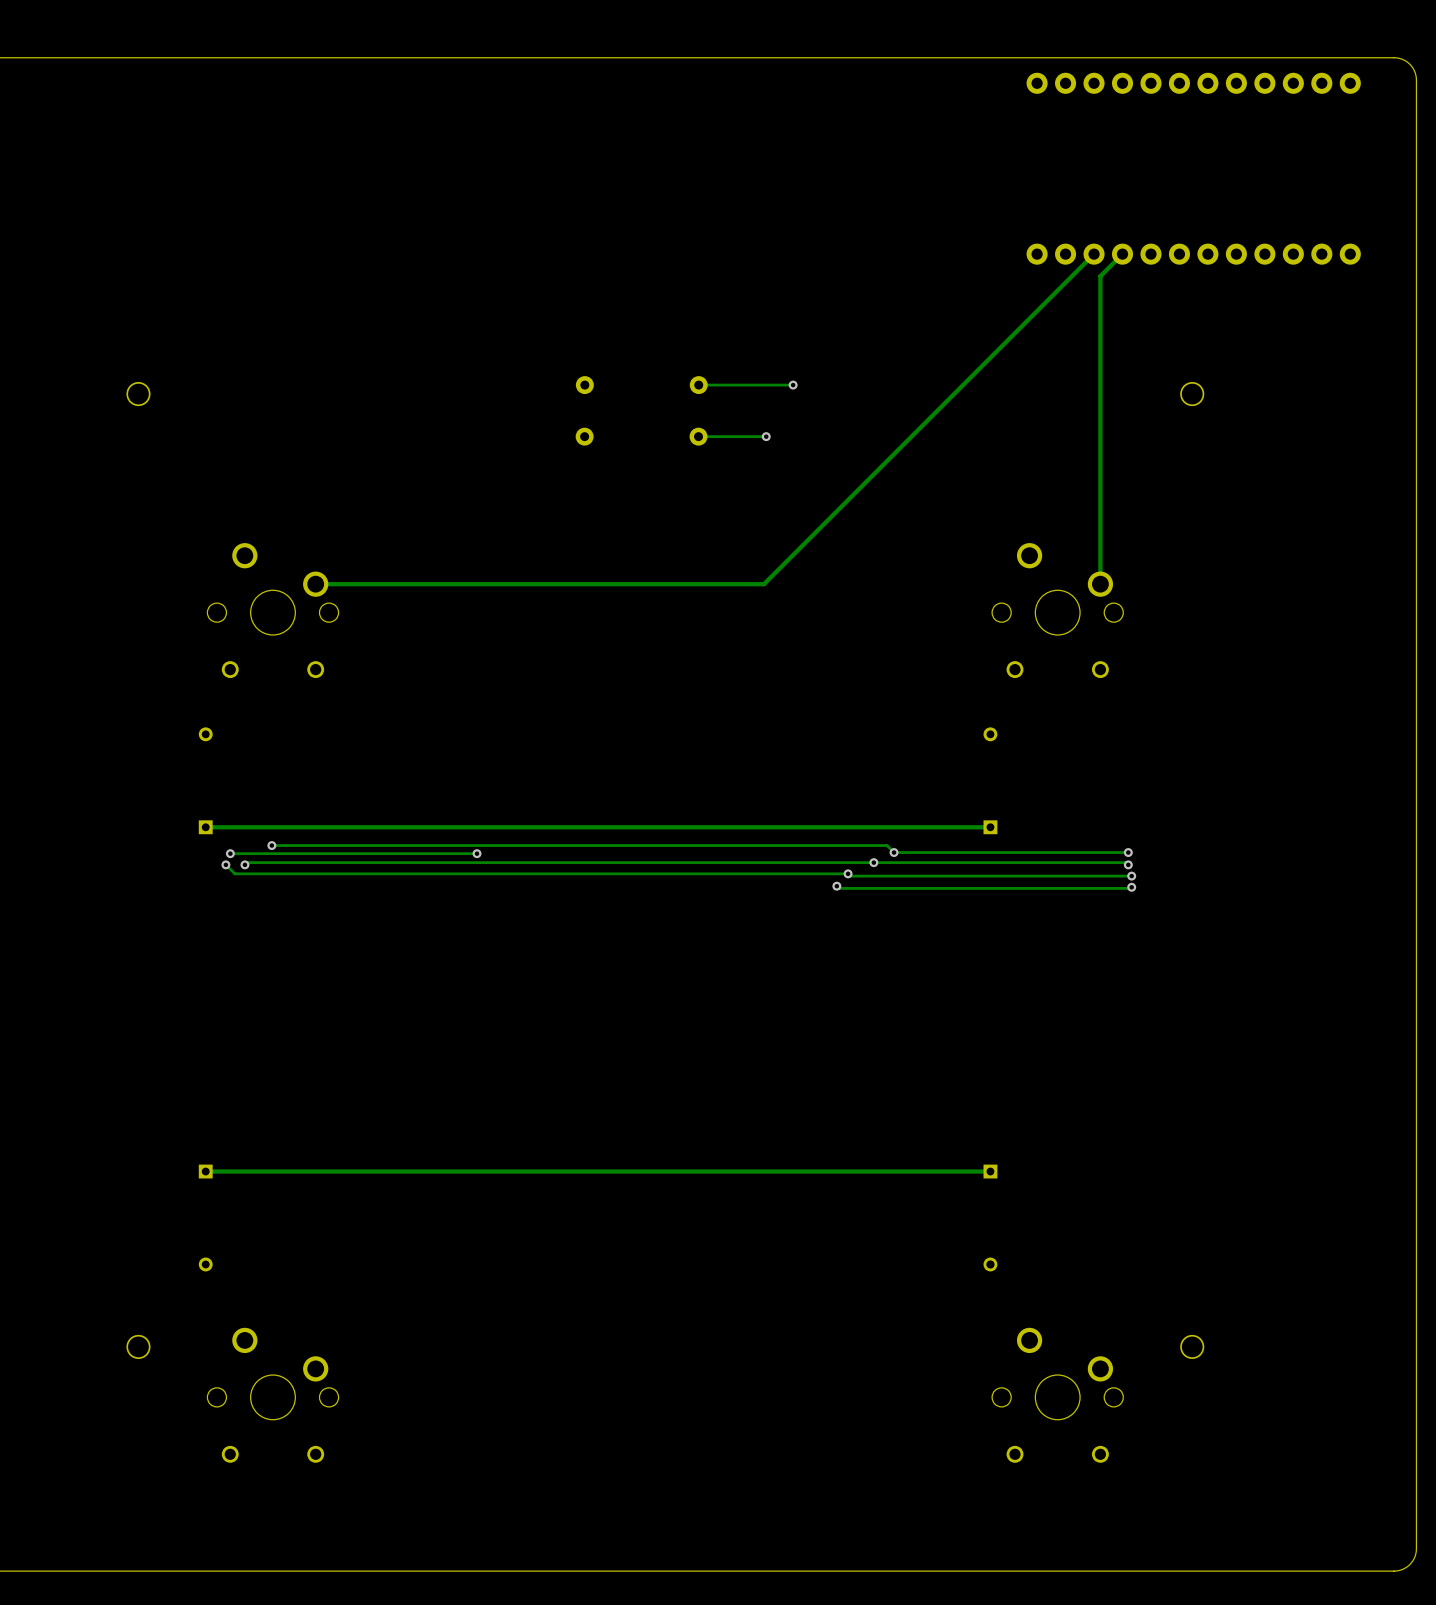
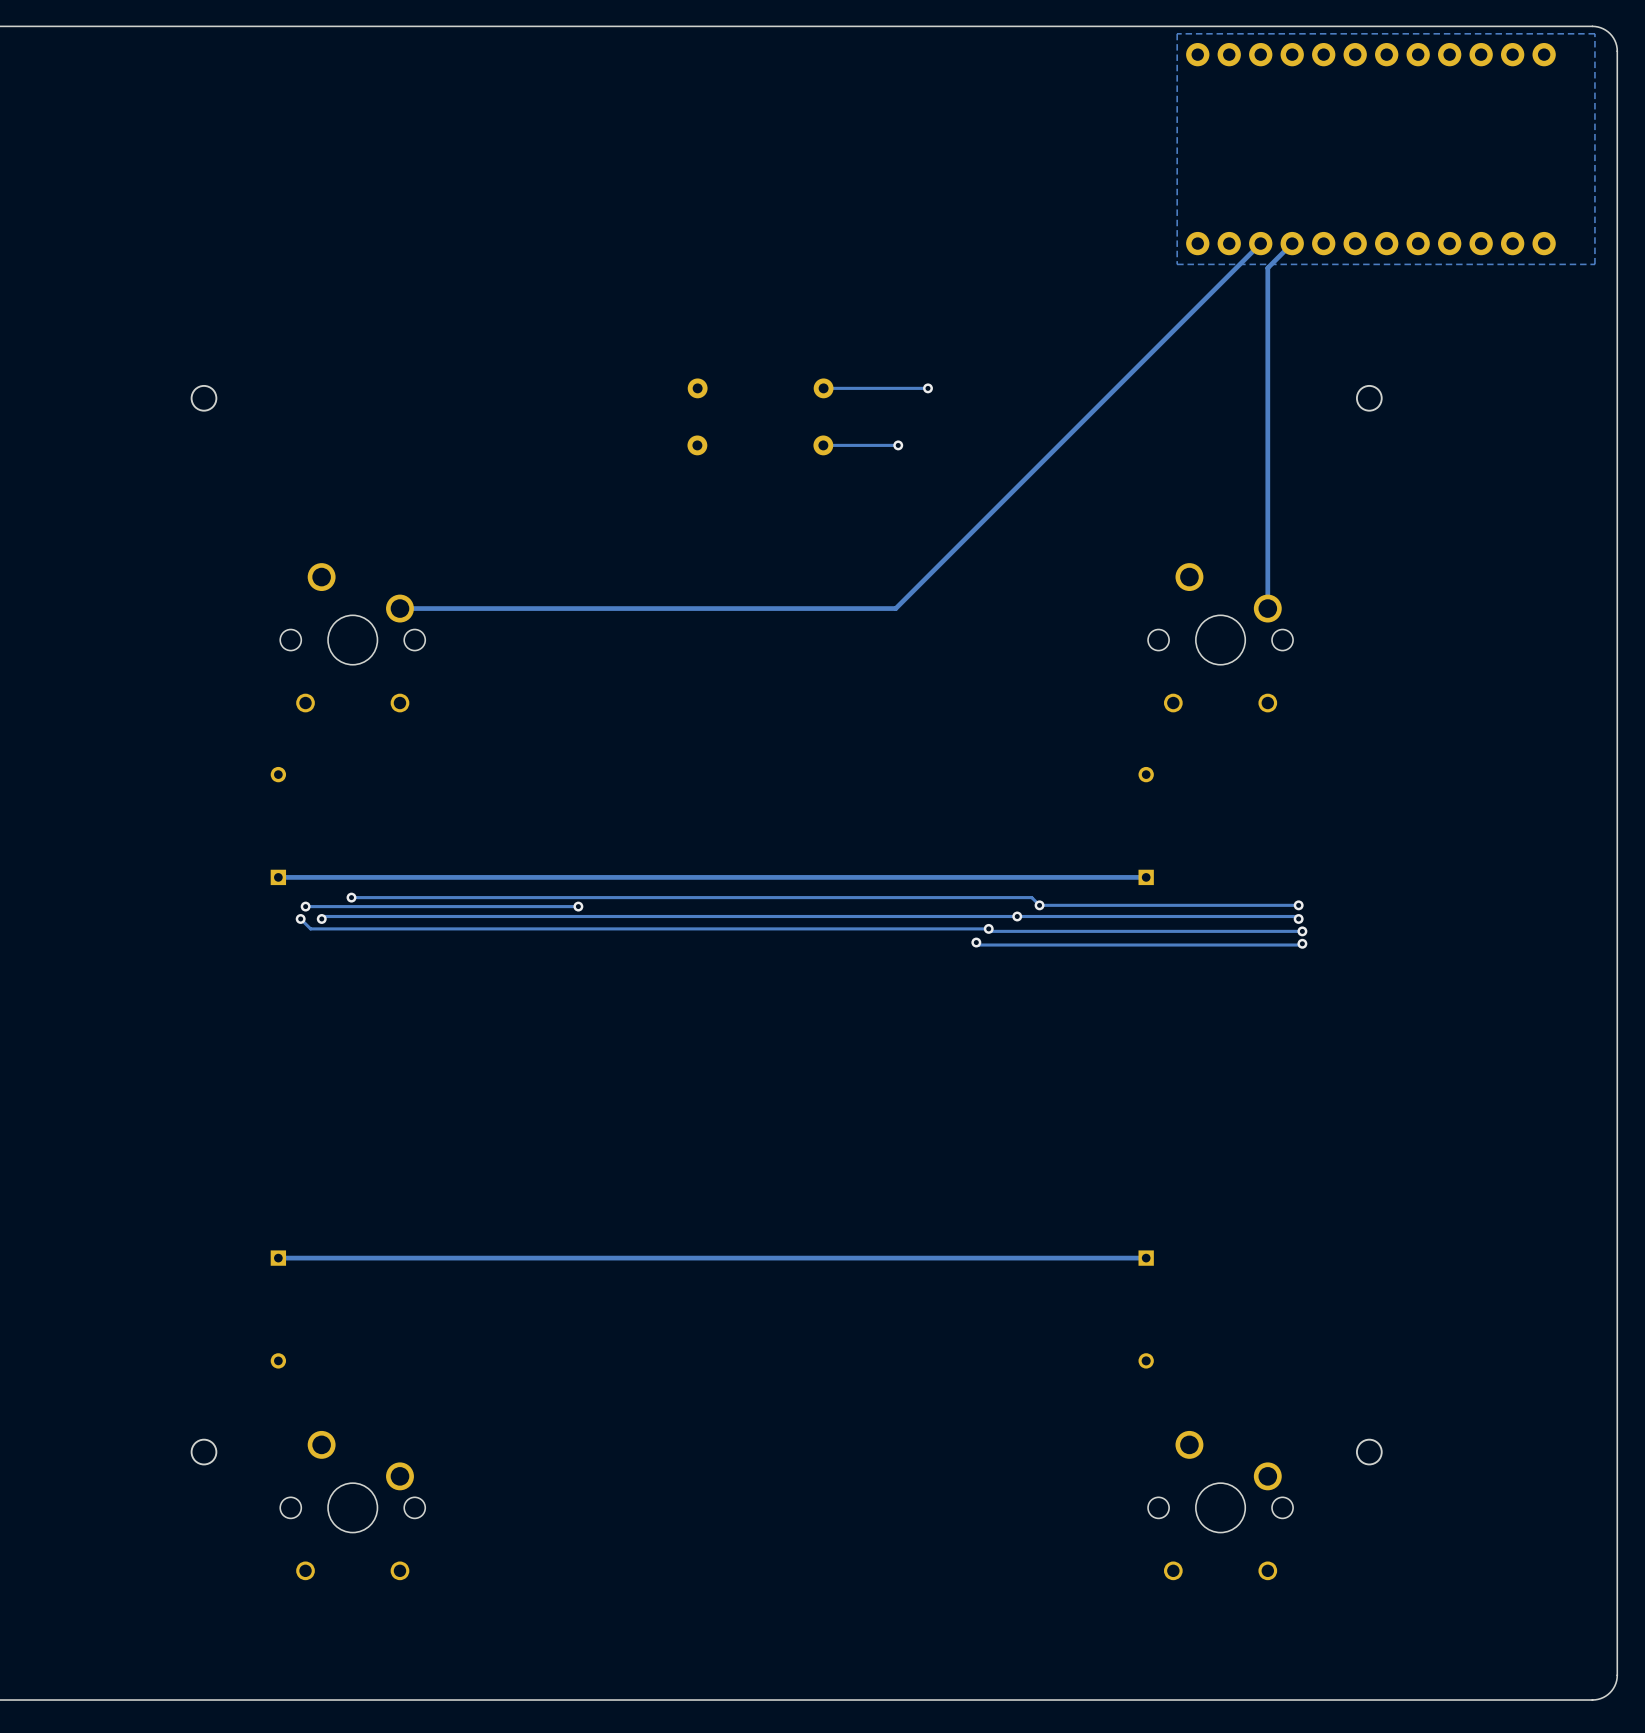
zone outline: none -> (1594, 33) (1594, 264) (1177, 264) (1177, 33) (1594, 33)

